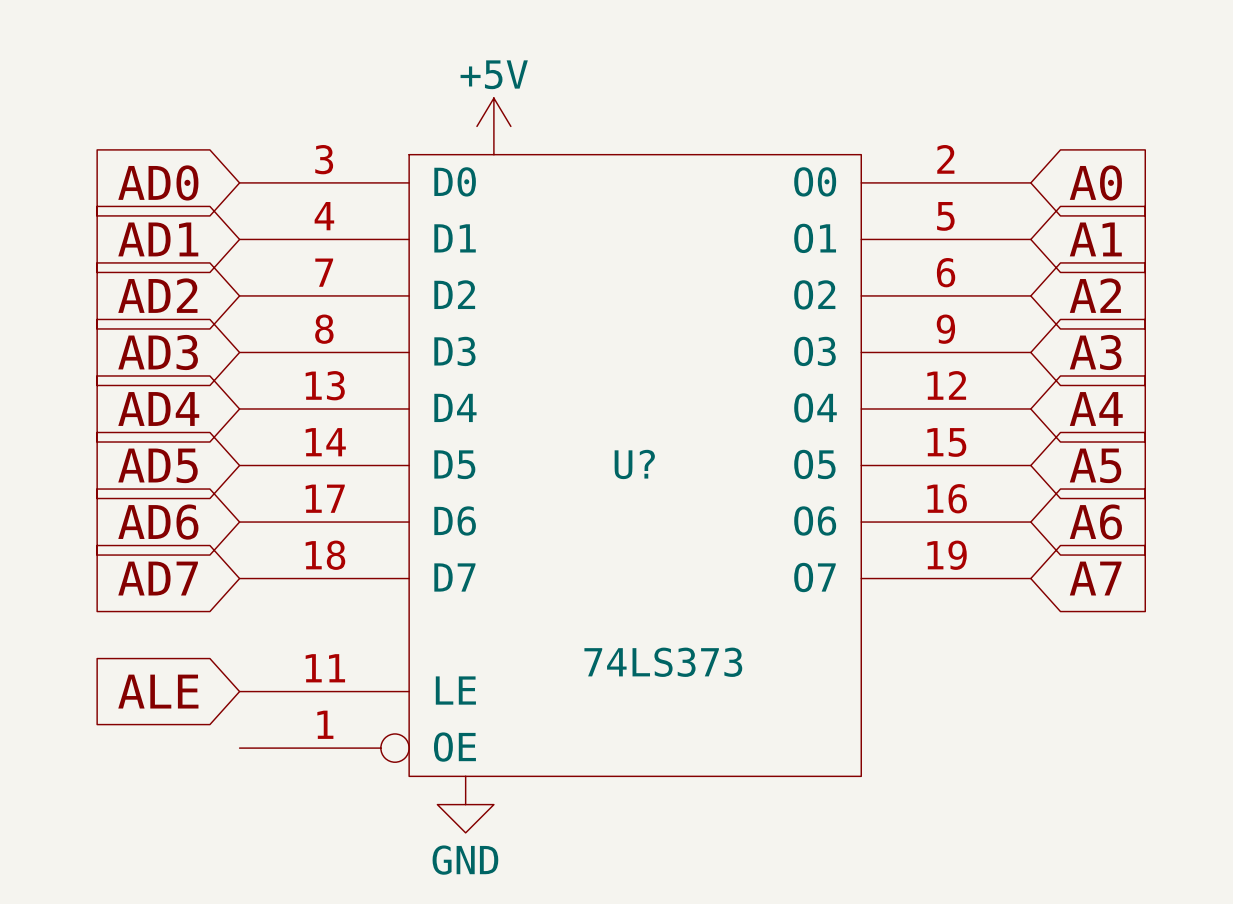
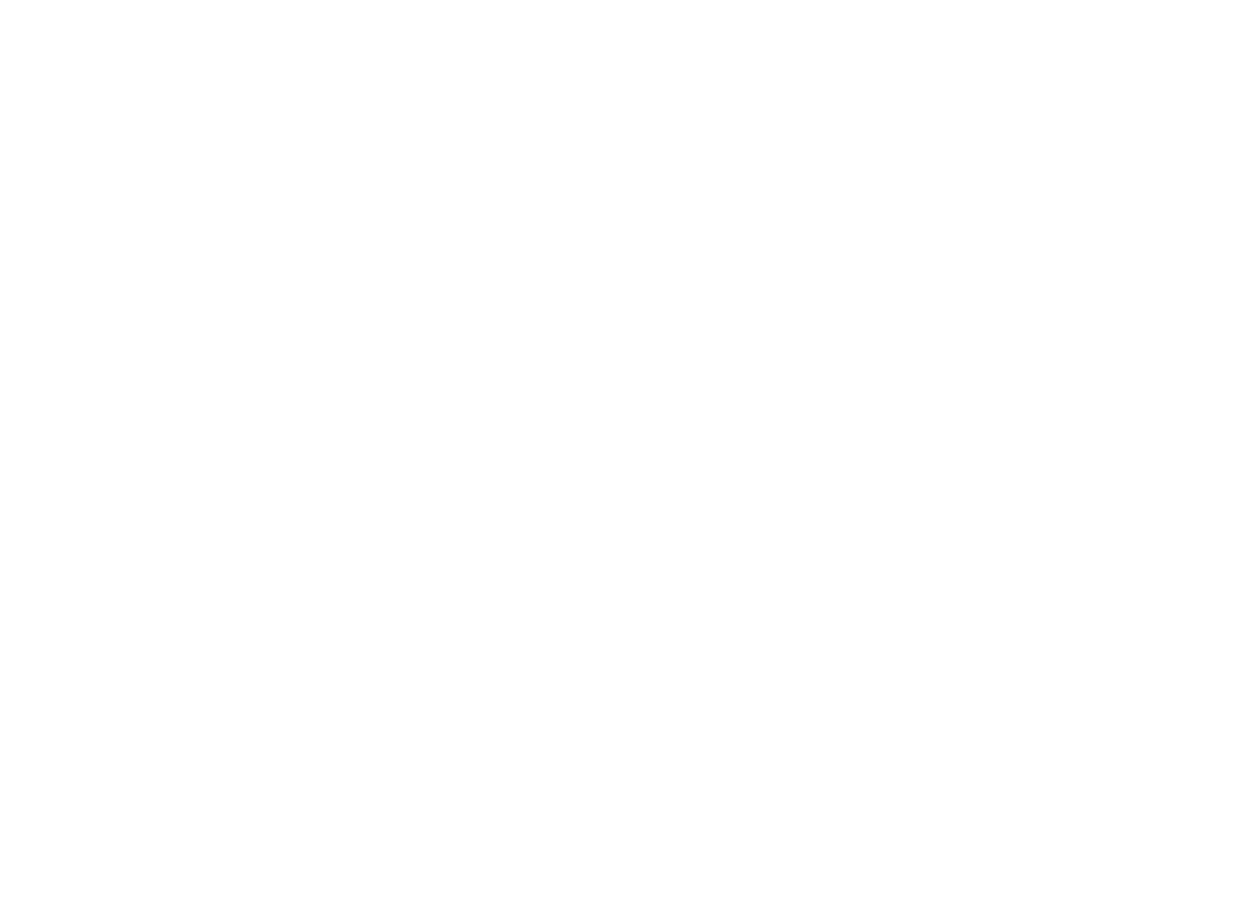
power symbol: +5V (493, 126) -> none
global label: AD0 (158, 182) -> none
global label: A0 (1095, 182) -> none
global label: AD1 (158, 239) -> none
global label: A1 (1095, 239) -> none
global label: AD2 (157, 295) -> none
global label: A2 (1095, 295) -> none
global label: AD3 (158, 352) -> none
global label: A3 (1095, 352) -> none
global label: AD4 (158, 408) -> none
global label: A4 (1096, 408) -> none
global label: AD5 (157, 465) -> none
U?: 74LS373 (635, 465) -> none
global label: A5 (1095, 465) -> none
global label: AD6 (158, 522) -> none
global label: A6 (1095, 522) -> none
global label: AD7 (158, 578) -> none
global label: A7 (1095, 578) -> none
global label: ALE (158, 691) -> none
power symbol: GND (465, 804) -> none

